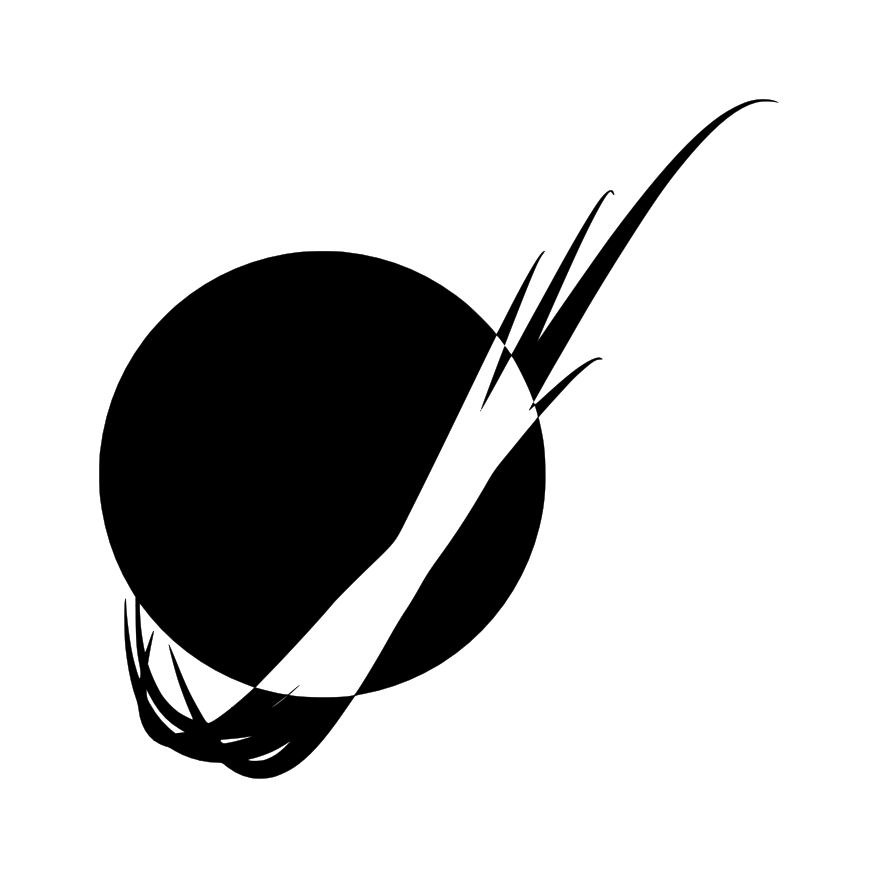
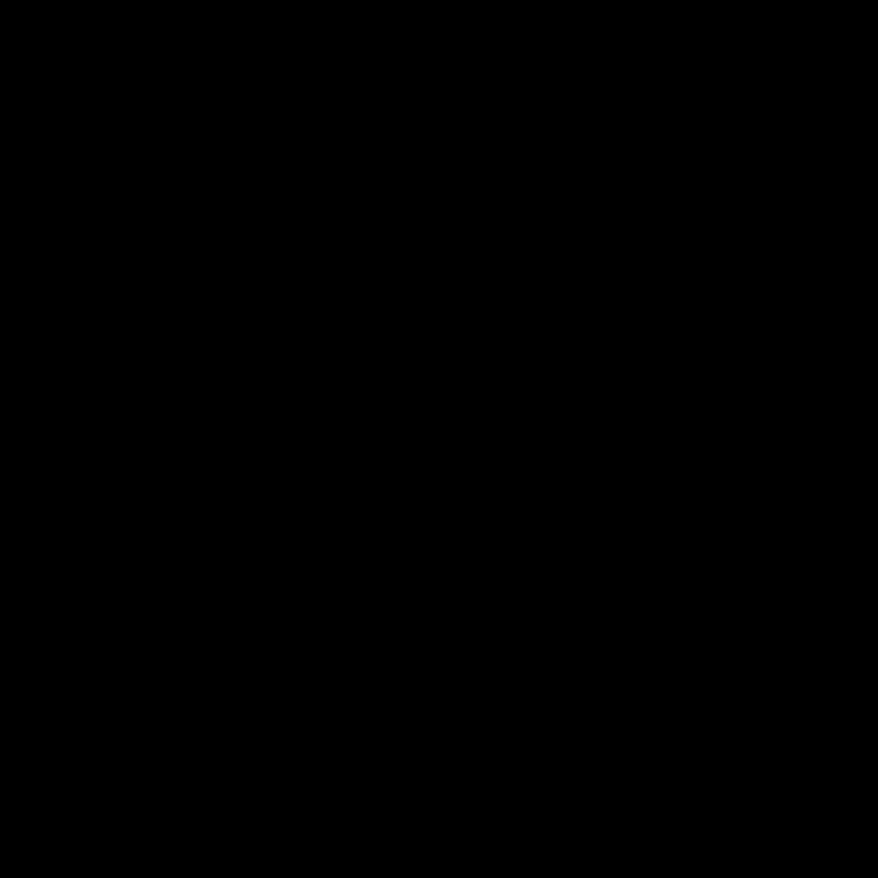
drawing: [99, 99, 779, 779] -> none

